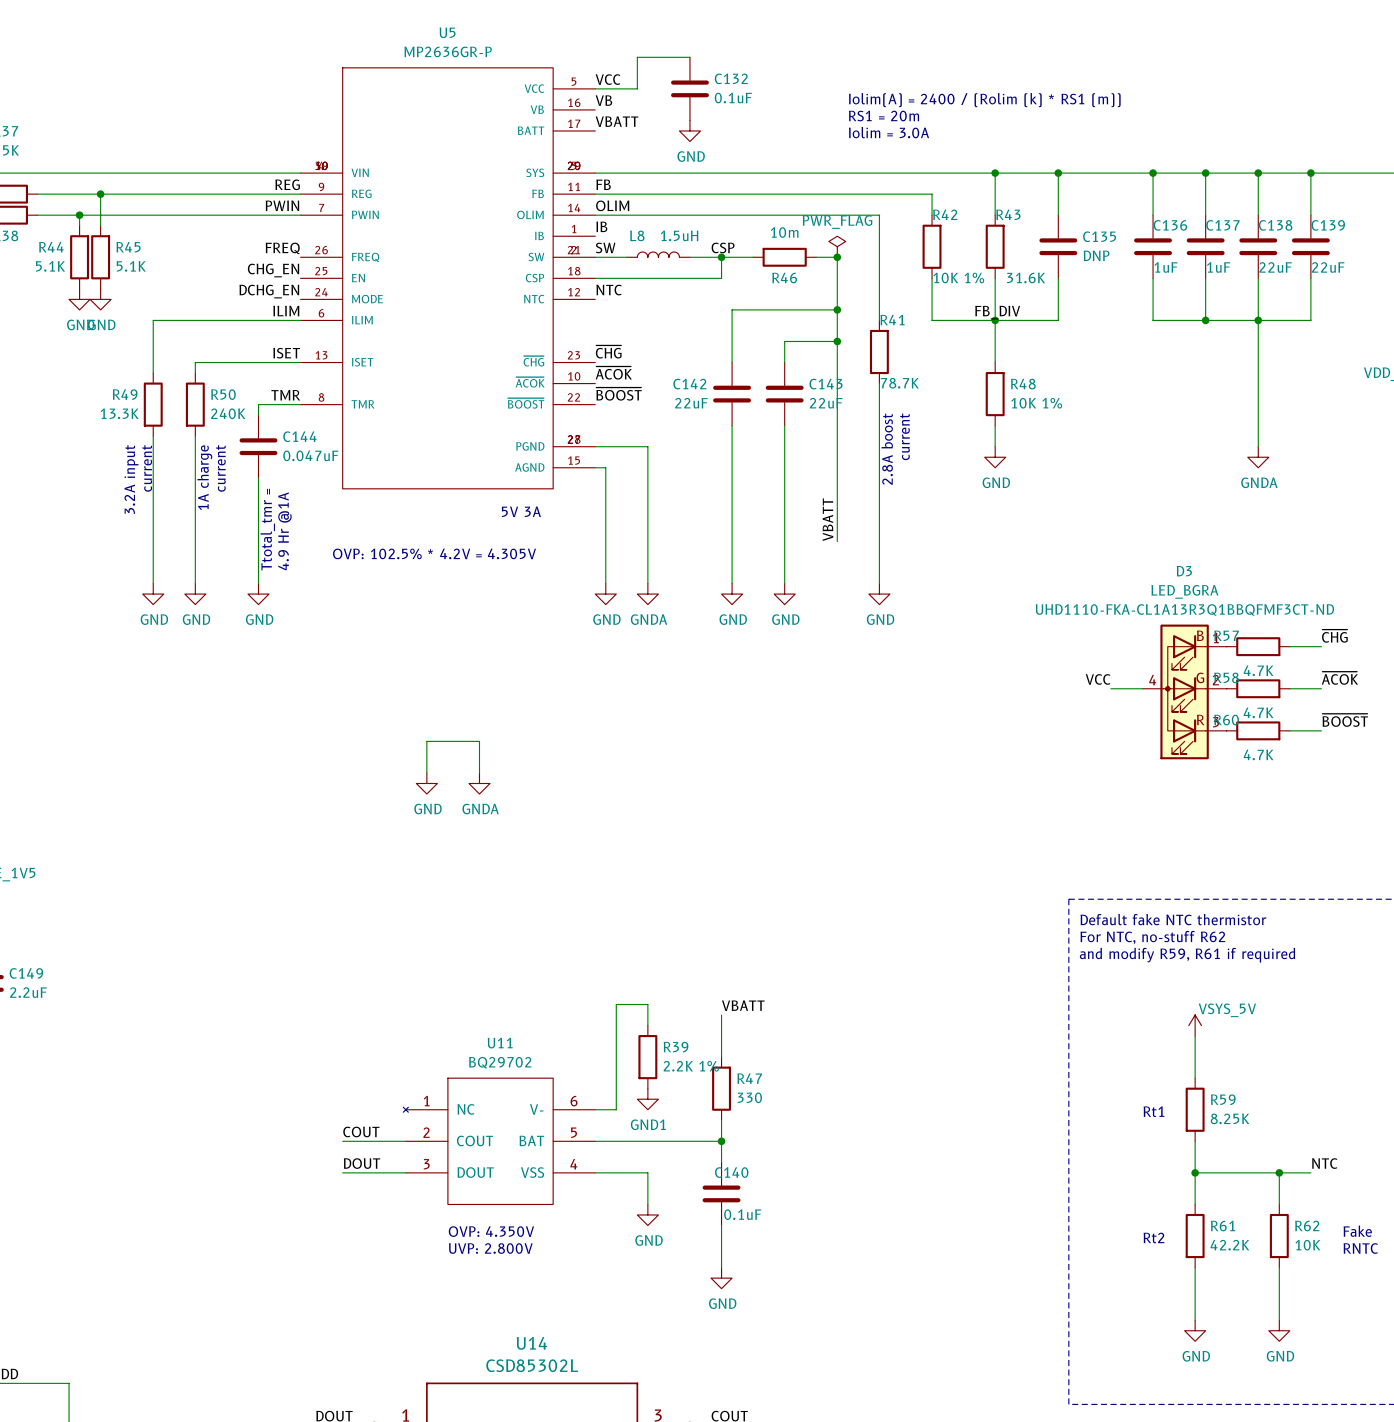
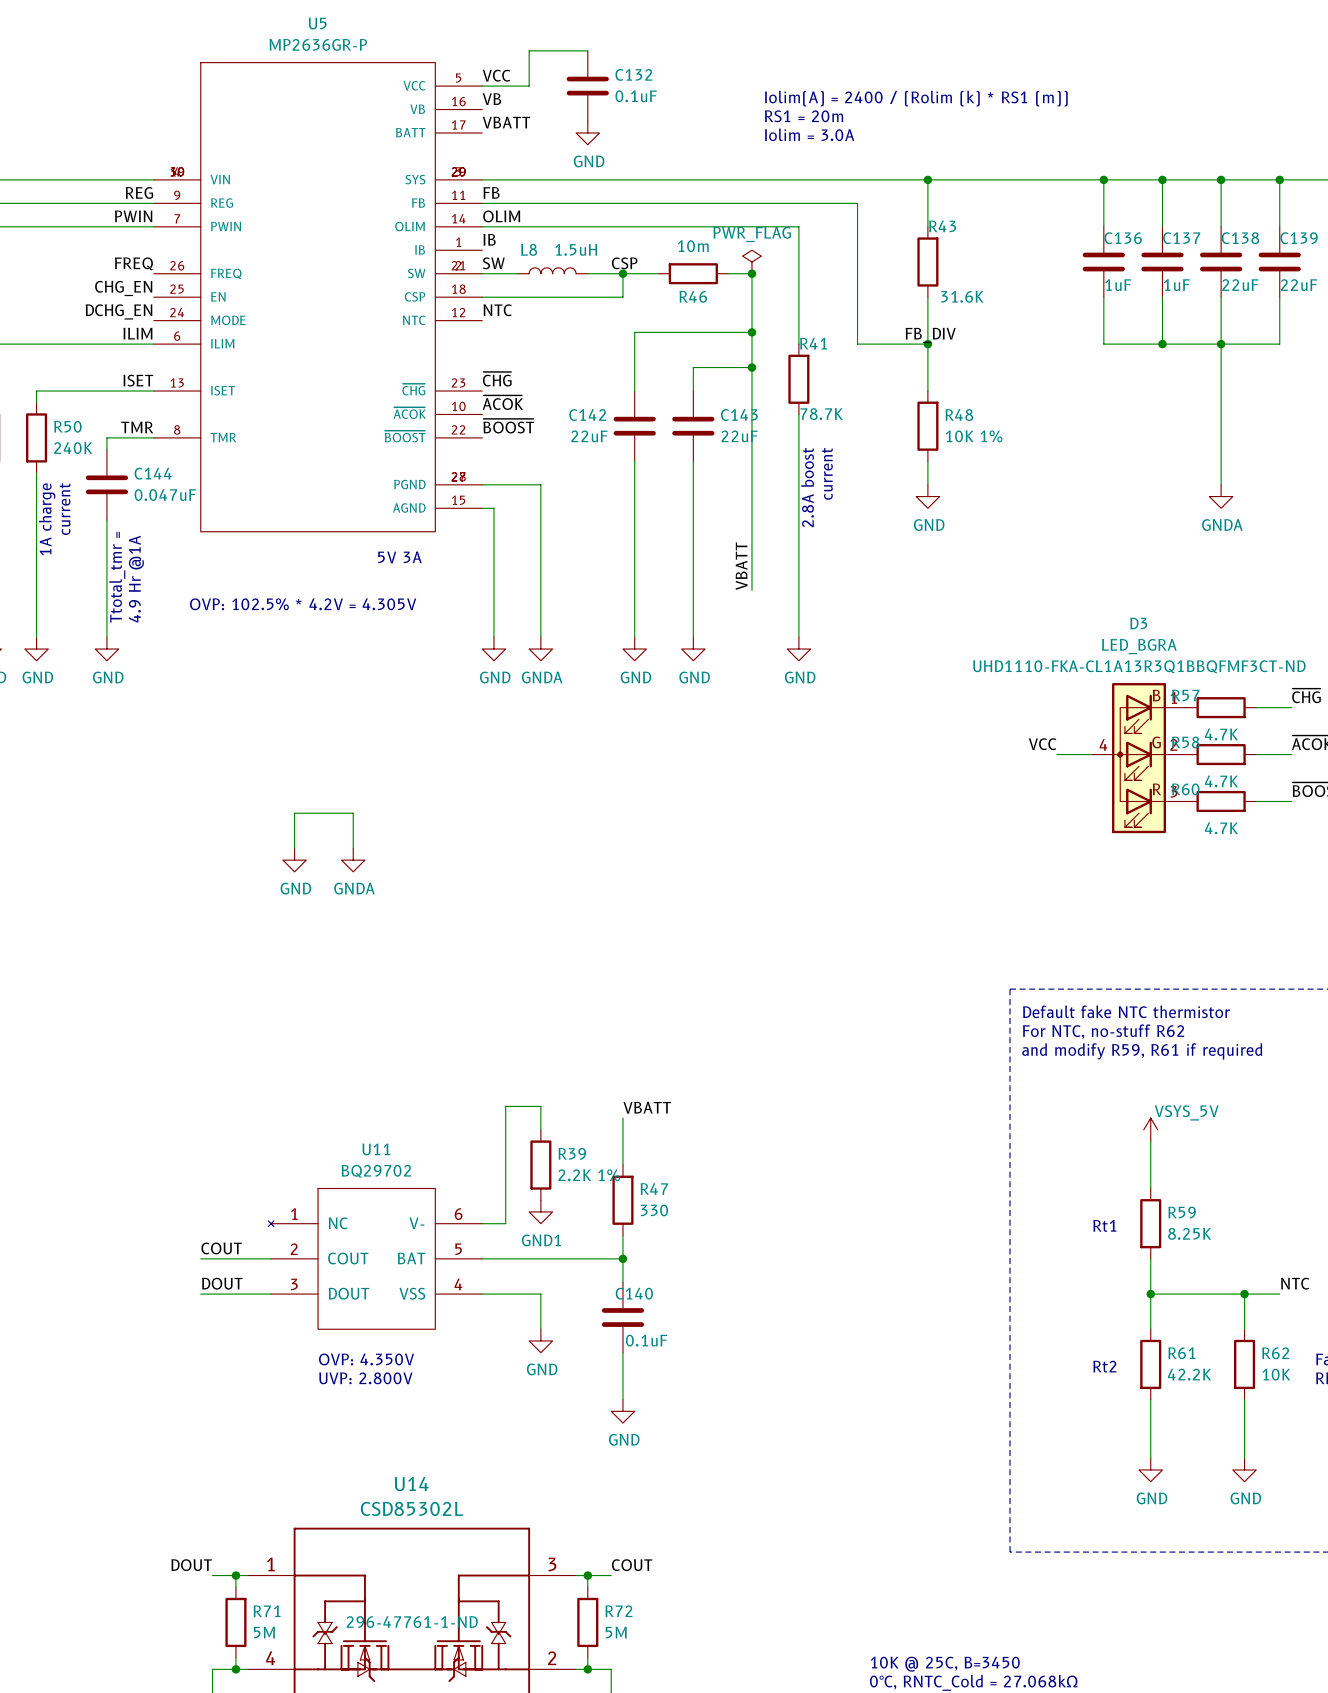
wire: (1058, 173) (1058, 215) -> none
junction: (1058, 173) -> none
wire: none -> (857, 226) (857, 297)
R42: 10K 1% (932, 246) -> none
C135: DNP (1058, 246) -> none
wire: (1058, 278) (1058, 320) (995, 320) -> none

